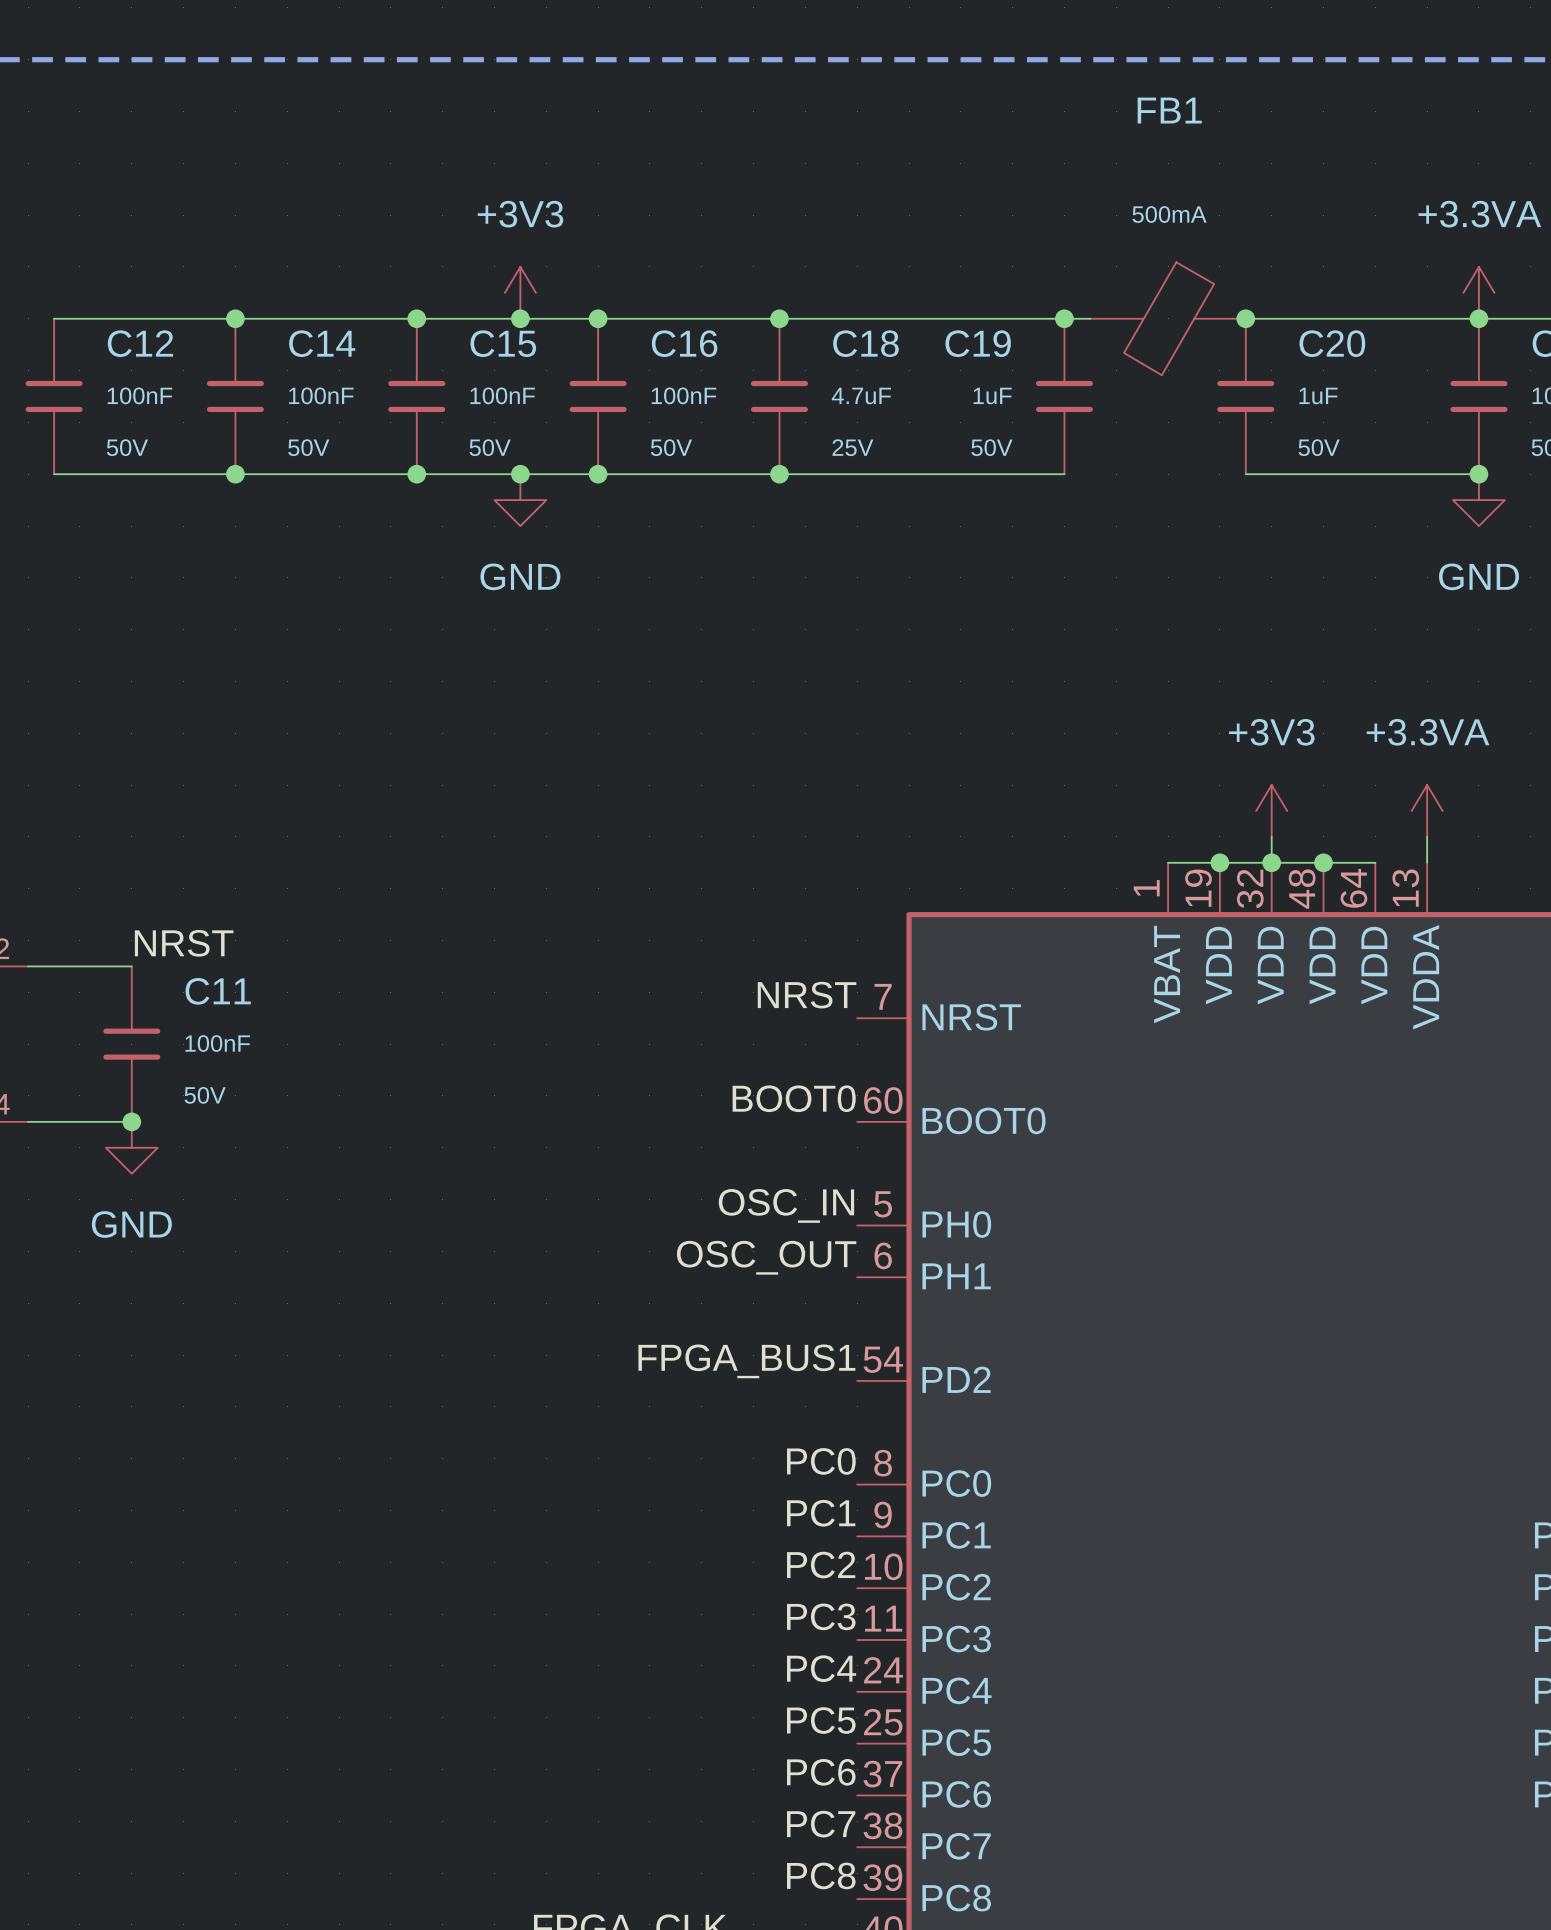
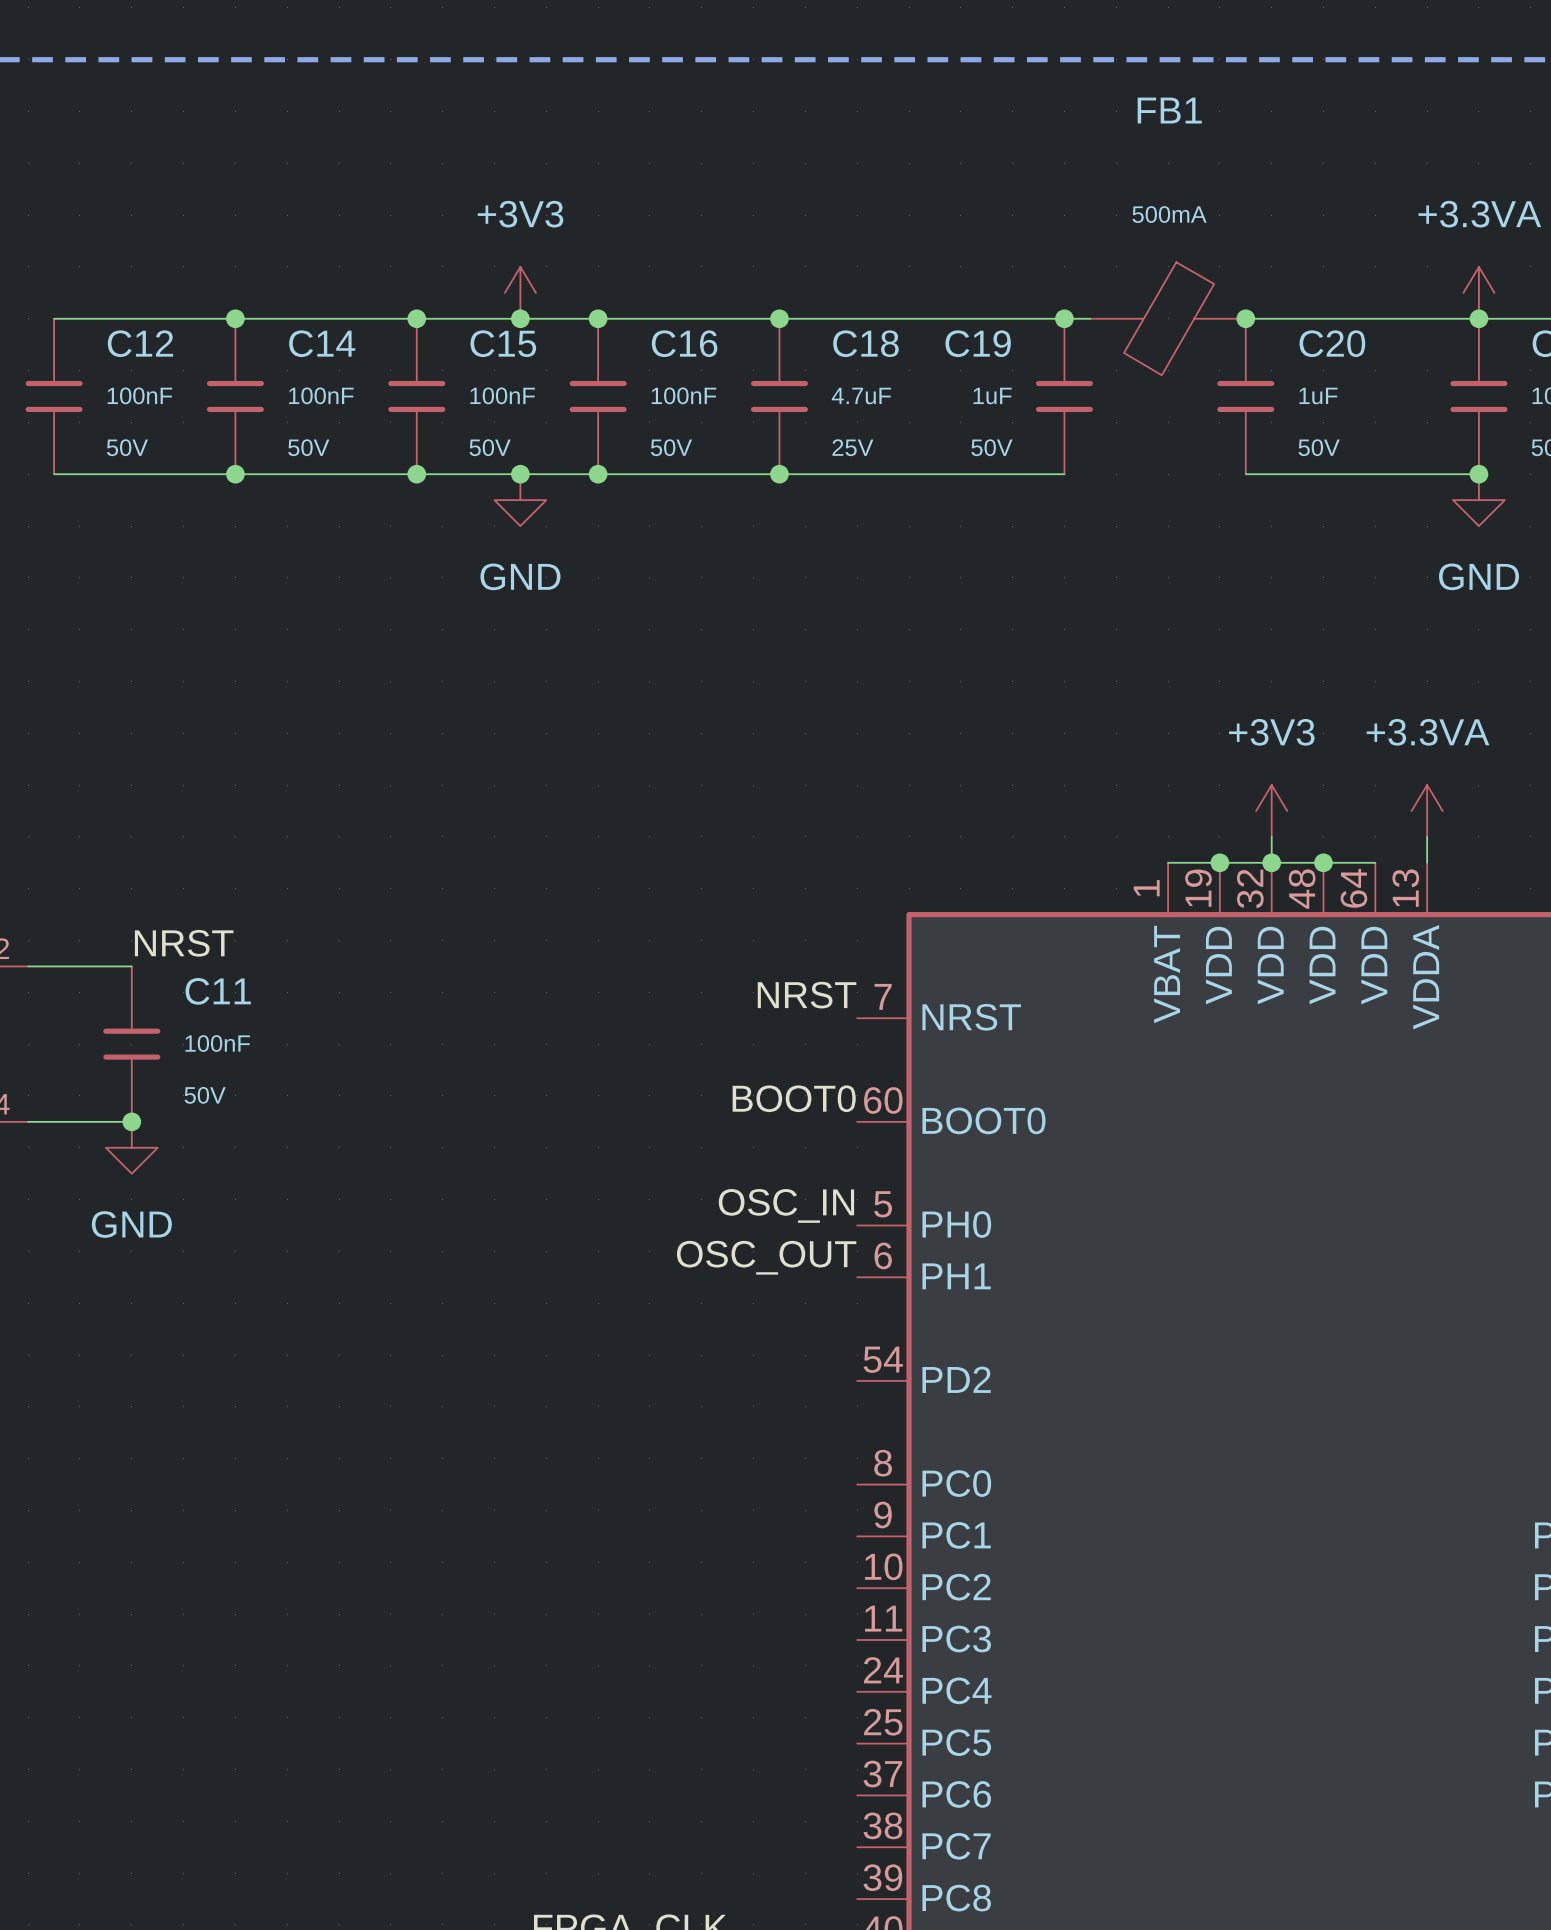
label: FPGA_BUS1 (746, 1361) -> none
label: PC0 (821, 1461) -> none
label: PC1 (821, 1513) -> none
label: PC2 (821, 1565) -> none
label: PC3 (821, 1616) -> none
label: PC4 (821, 1668) -> none
label: PC5 (821, 1720) -> none
label: PC6 (821, 1772) -> none
label: PC7 (821, 1824) -> none
label: PC8 (821, 1875) -> none

